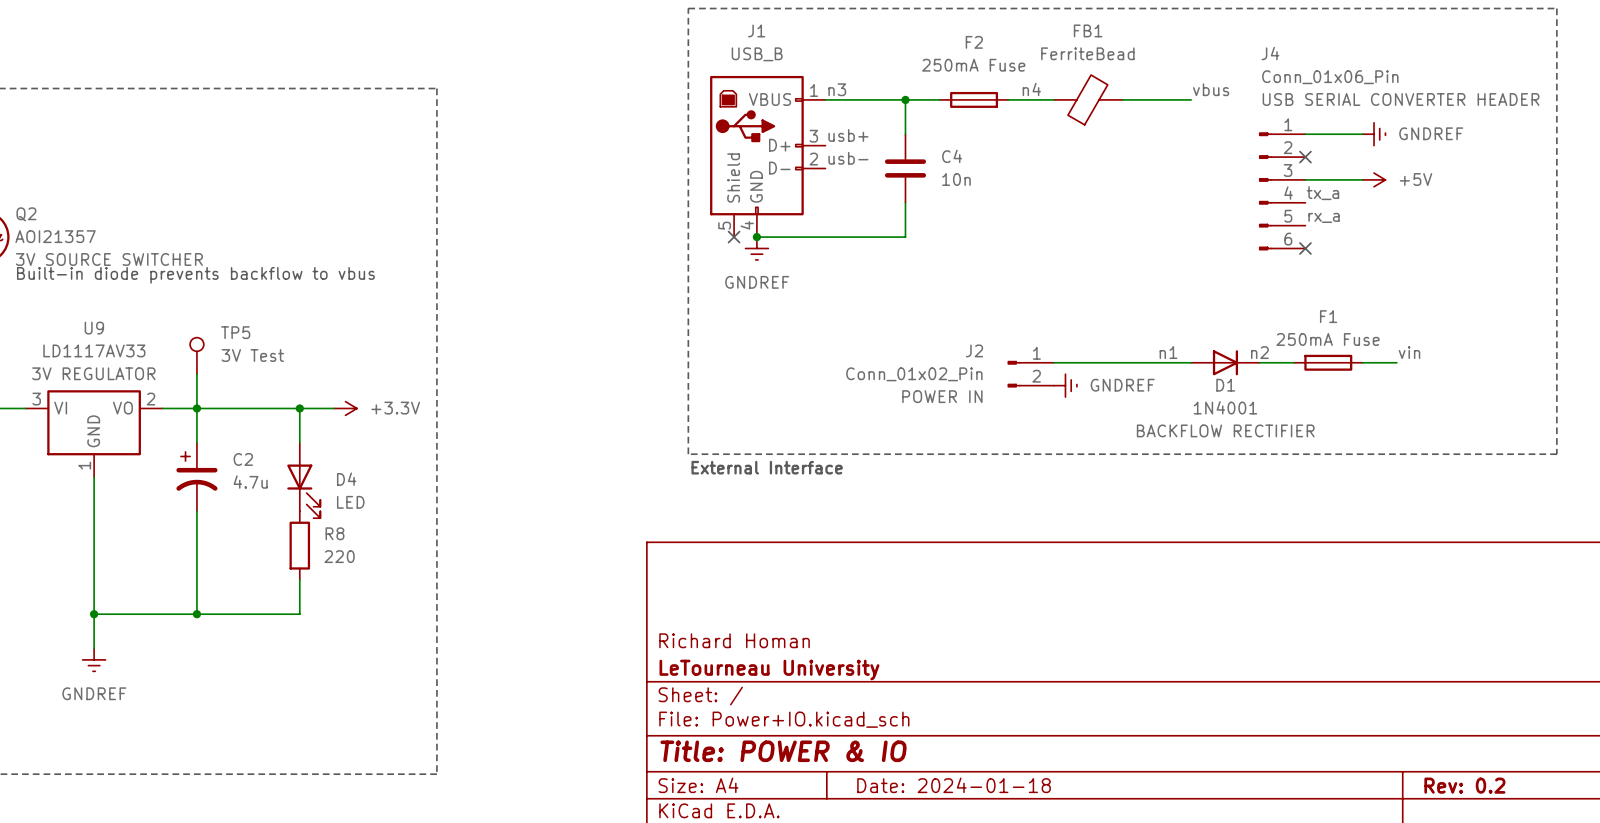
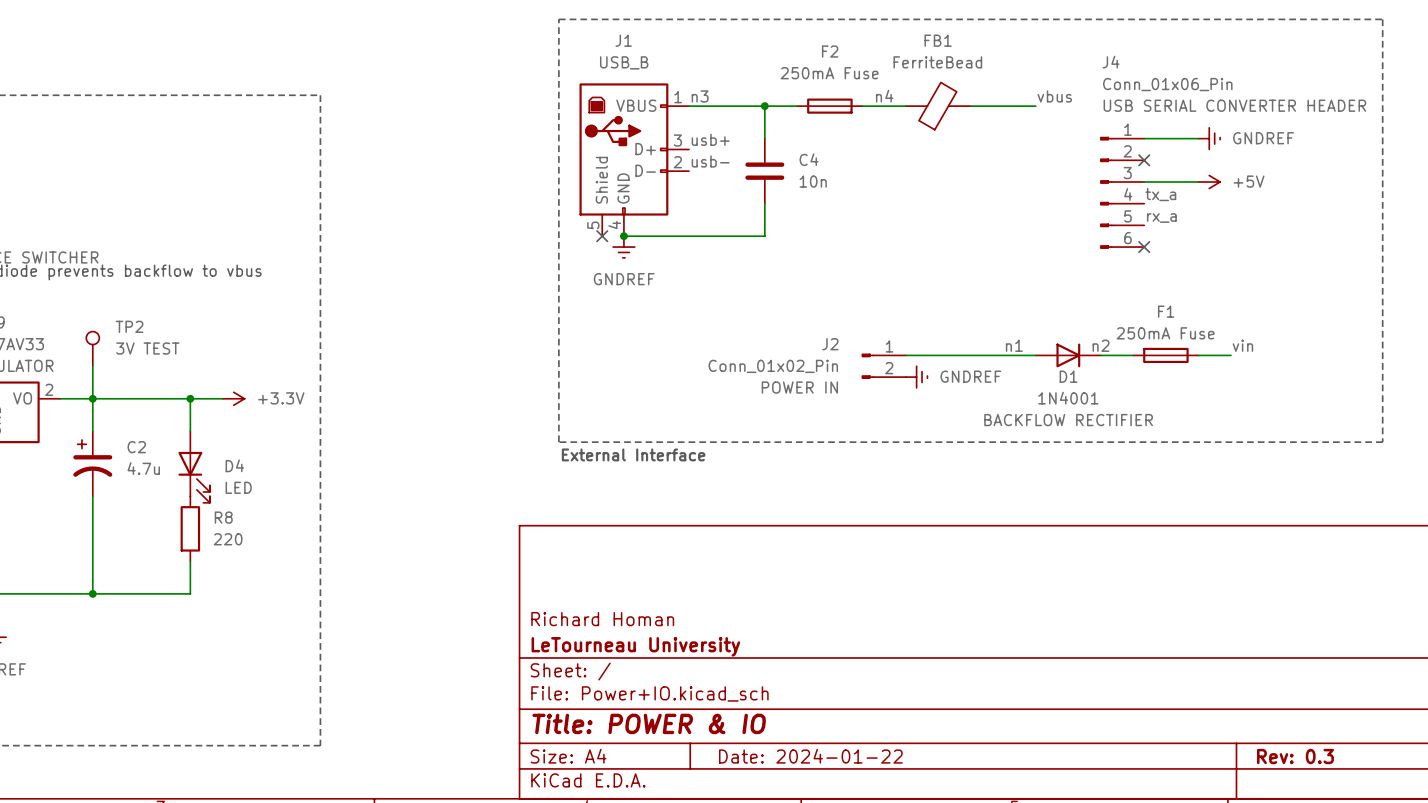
TP5 name: TP5 (235, 332) -> TP2 (129, 326)
TP5 value: 3V Test (252, 355) -> 3V TEST (147, 348)
title block: Date: 2024-01-18 (954, 785) -> Date: 2024-01-22 (810, 756)
title block: Rev: 0.2 (1464, 785) -> Rev: 0.3 (1295, 756)

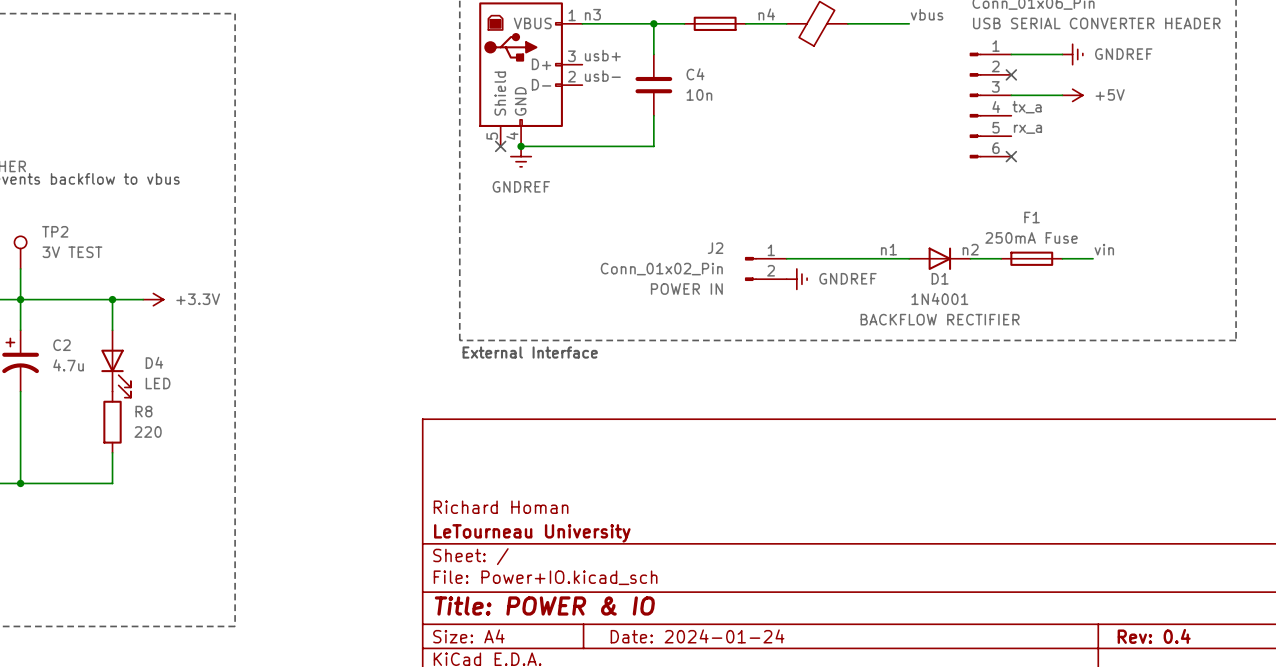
title block: Date: 2024-01-22 (810, 756) -> Date: 2024-01-24 (697, 636)
title block: Rev: 0.3 (1295, 756) -> Rev: 0.4 (1154, 636)

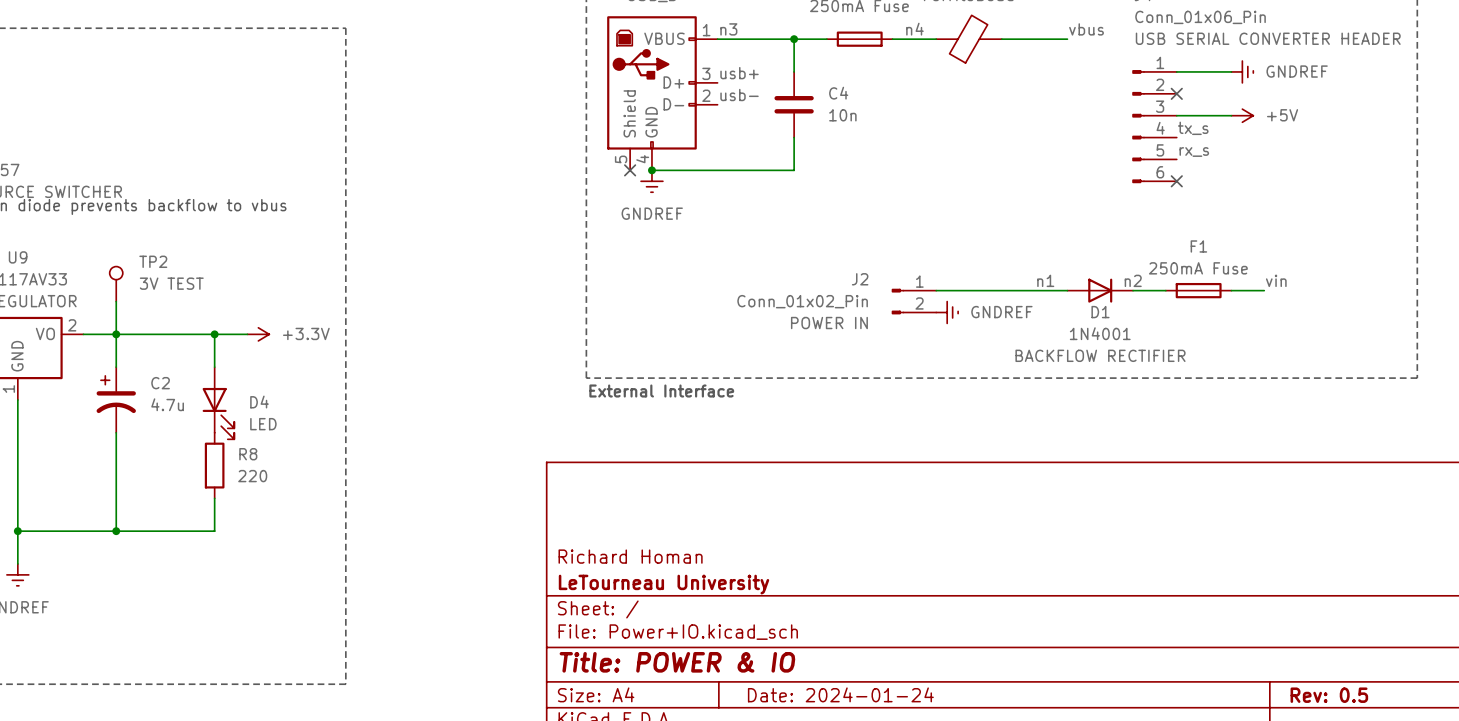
label: tx_a (1026, 107) -> tx_s (1193, 128)
label: rx_a (1027, 129) -> rx_s (1194, 152)
title block: Rev: 0.4 (1154, 636) -> Rev: 0.5 (1329, 695)

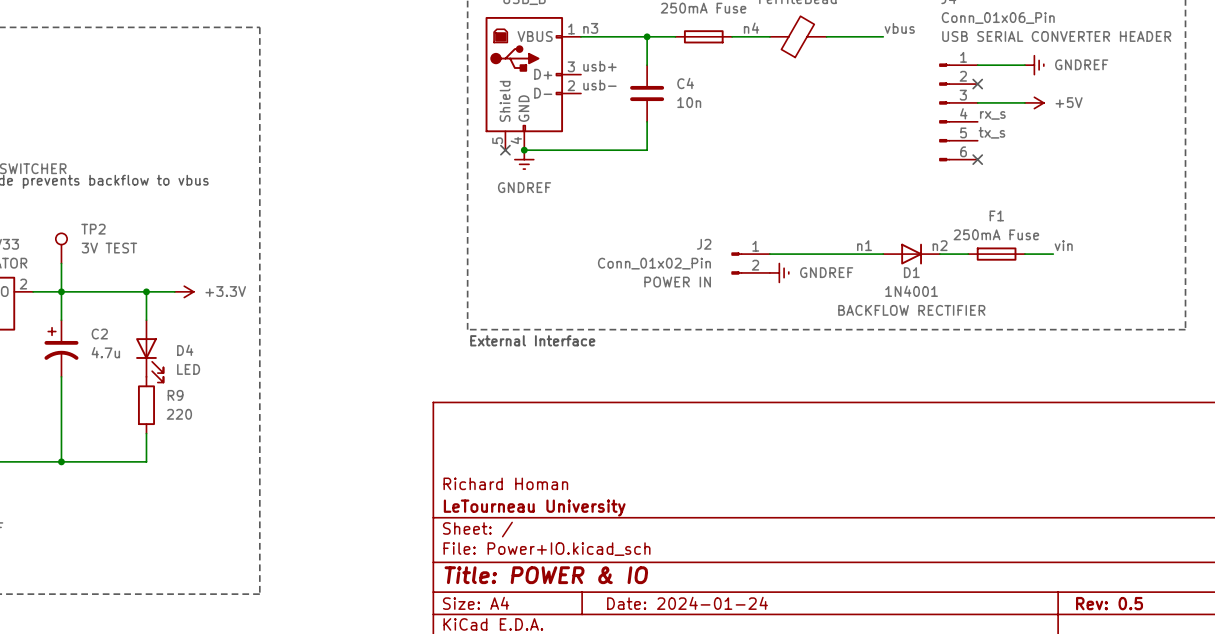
label: tx_s (1193, 128) -> rx_s (992, 115)
label: rx_s (1194, 152) -> tx_s (991, 132)
R8 name: R8 (248, 454) -> R9 (175, 395)

